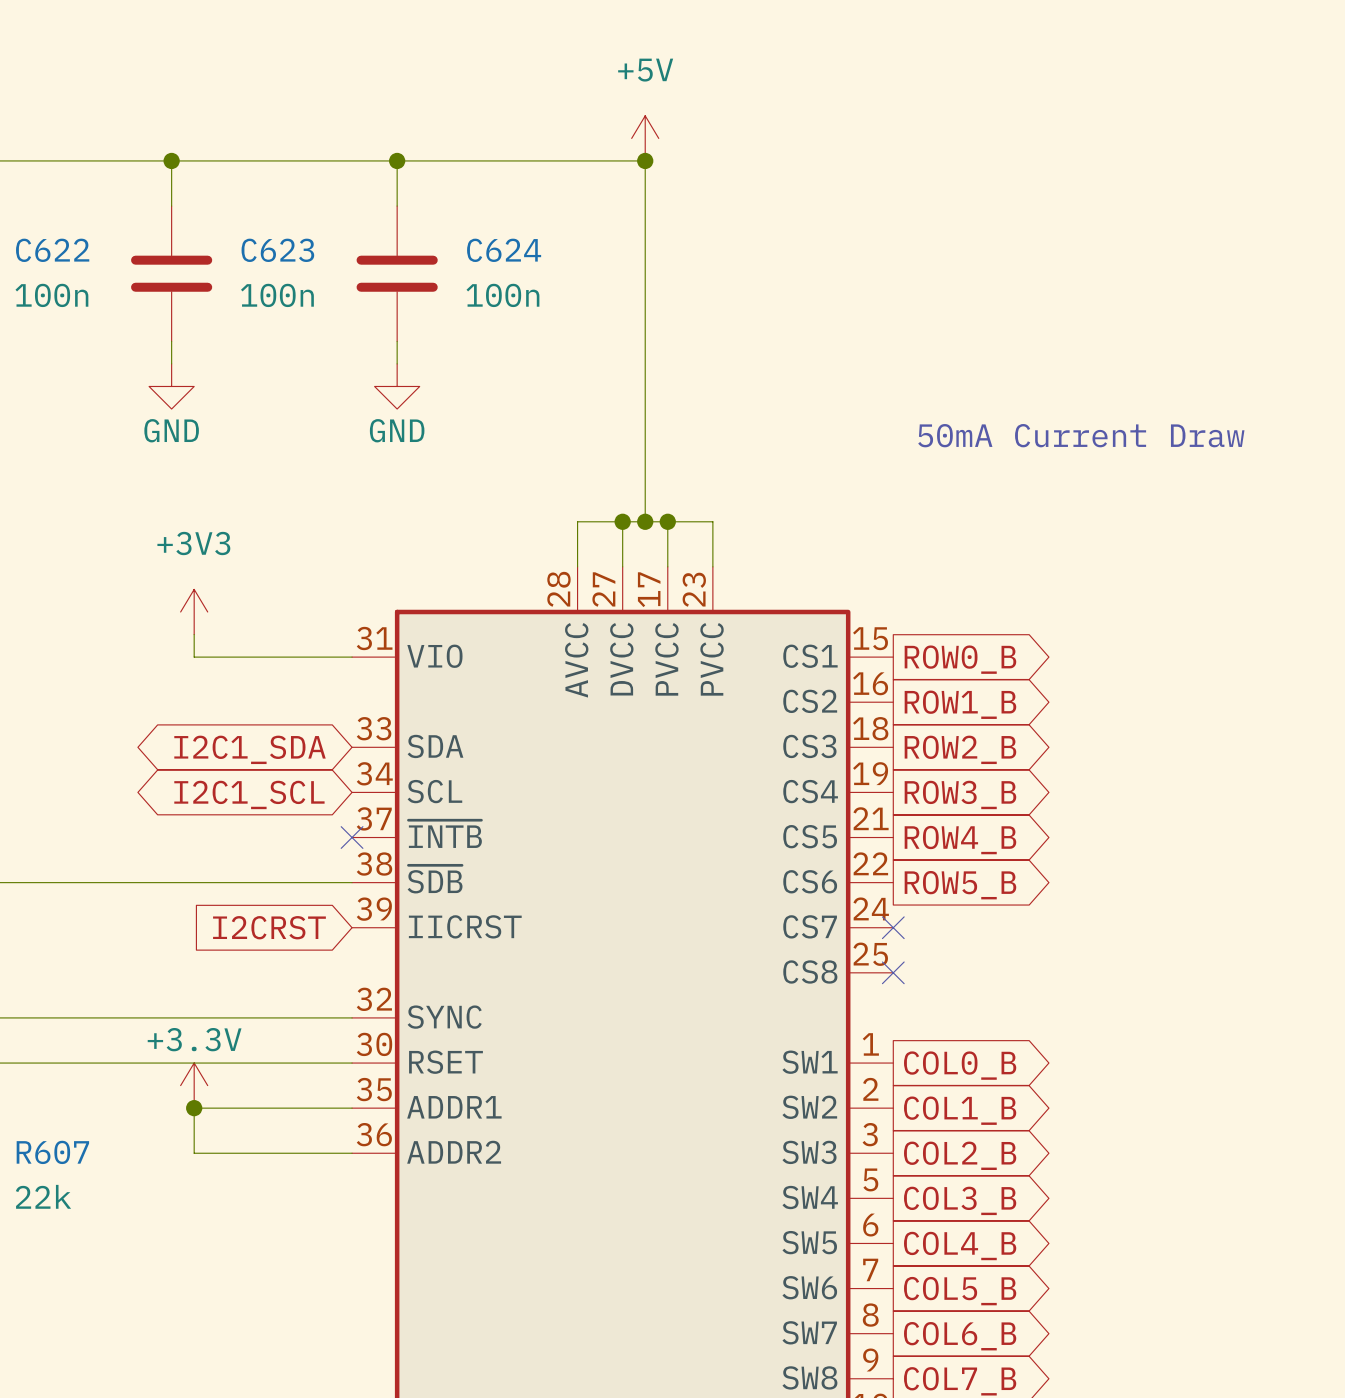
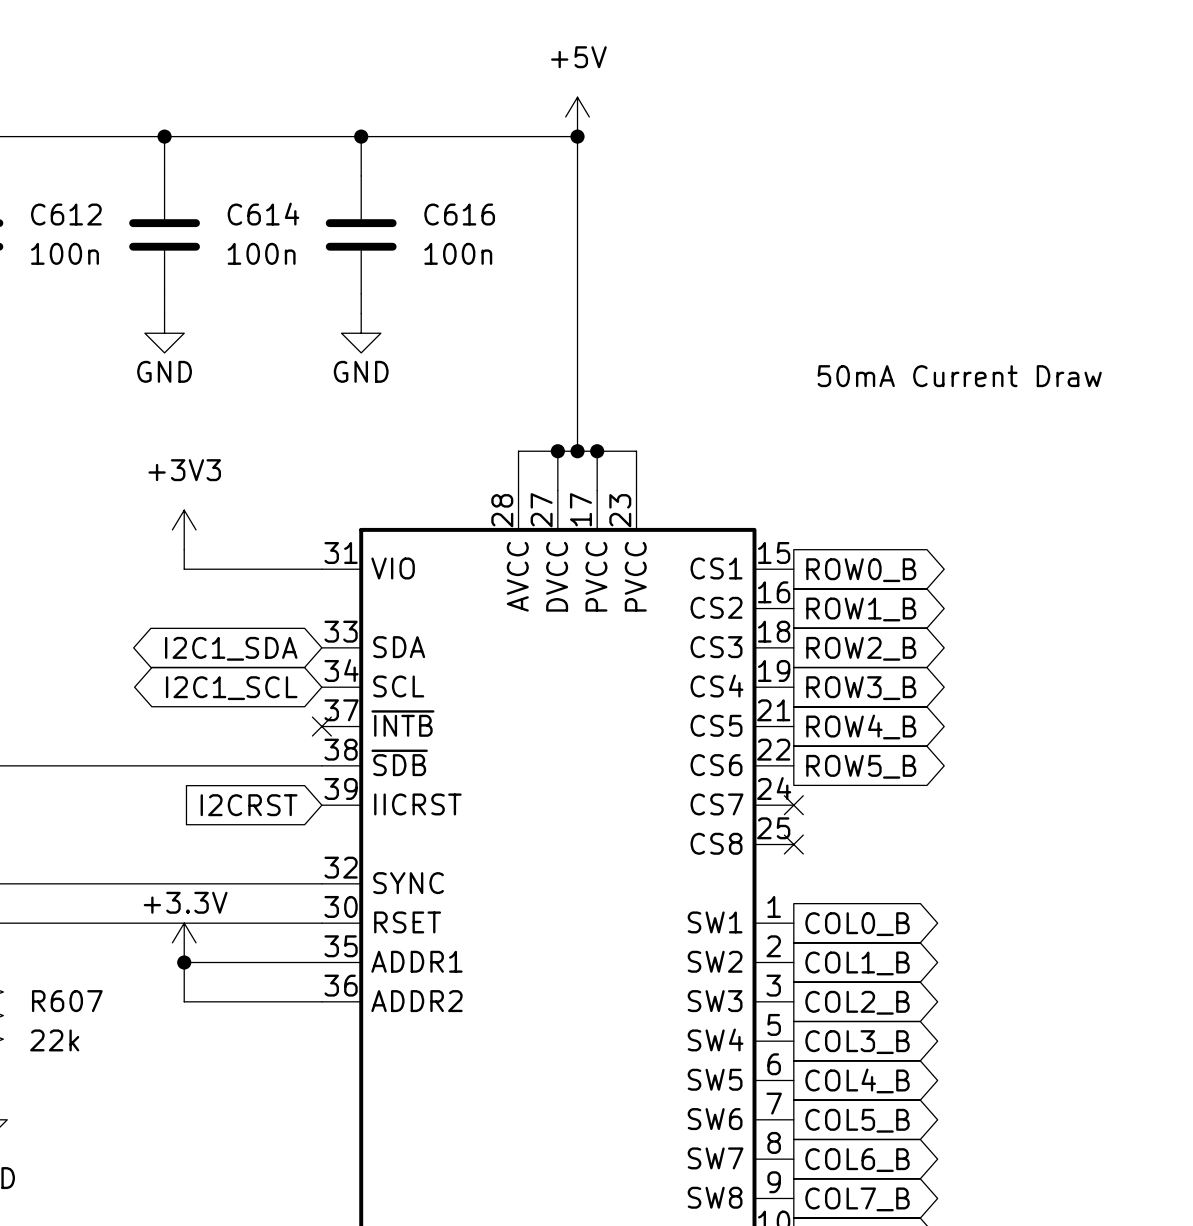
C622 name: C622 (52, 250) -> C612 (66, 214)
C623 name: C623 (277, 250) -> C614 (263, 214)
C624 name: C624 (504, 250) -> C616 (459, 214)

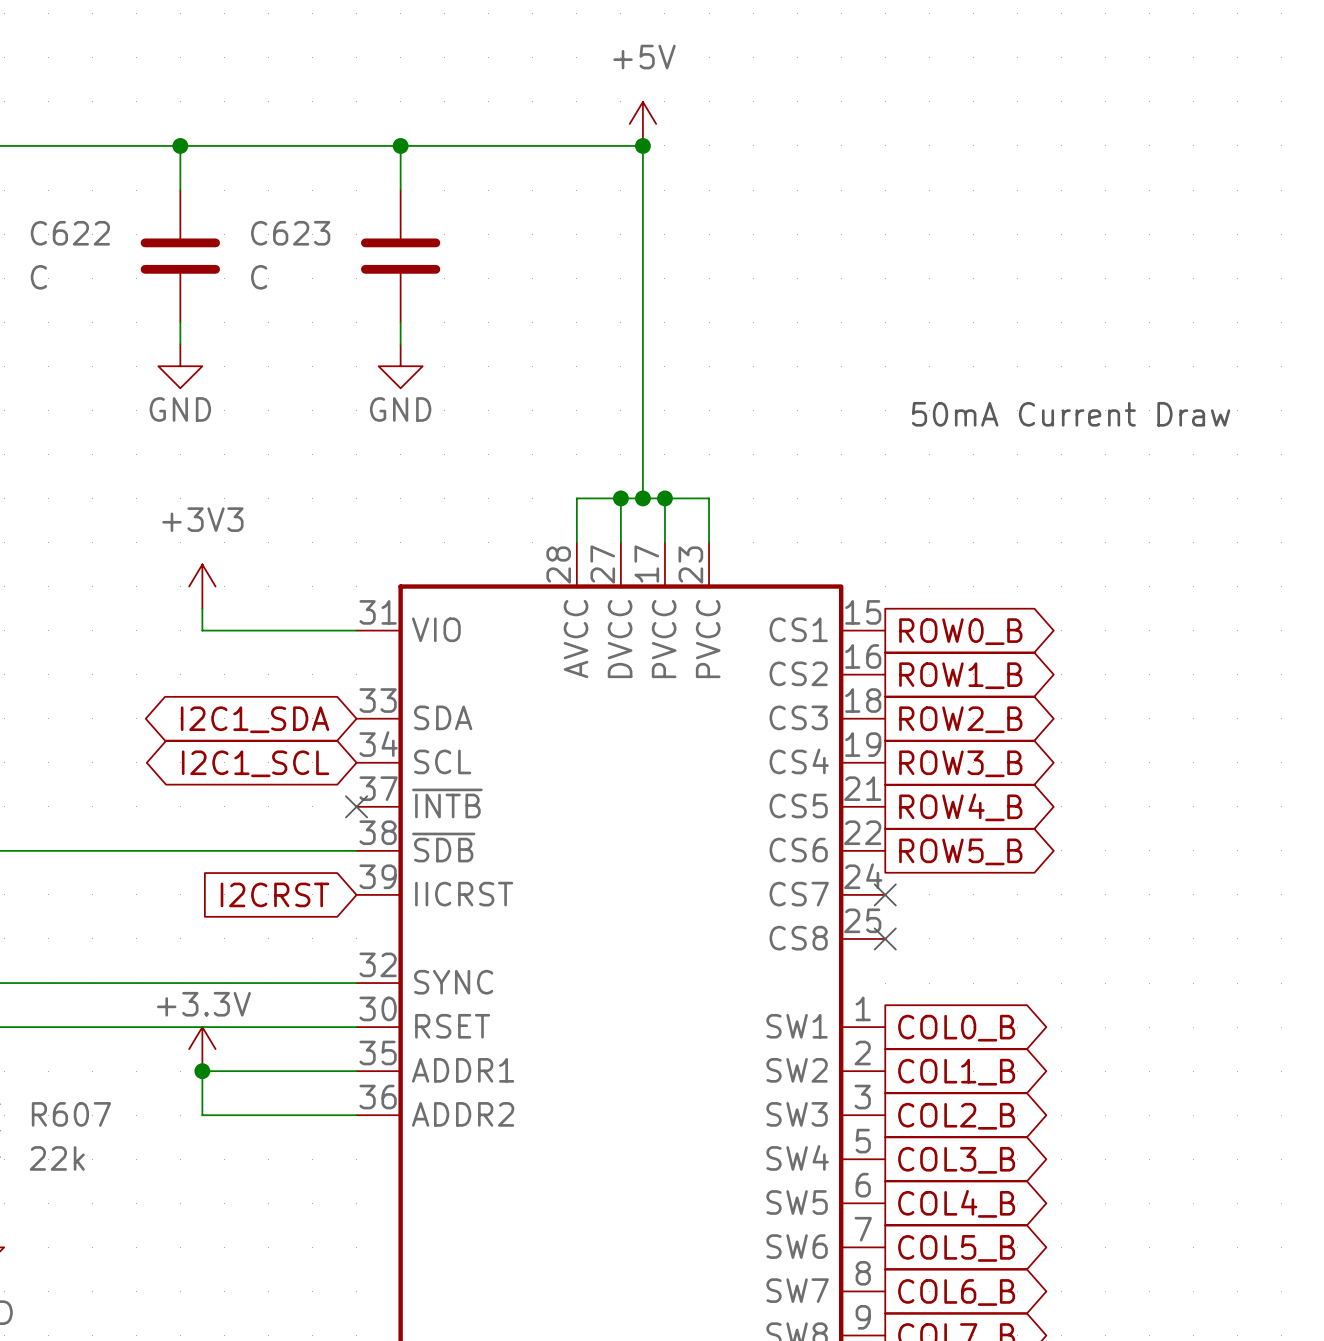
C612 name: C612 (66, 214) -> C622 (70, 233)
C614 name: C614 (263, 214) -> C623 (290, 233)
C616 name: C616 (459, 214) -> none
C612 value: 100n (64, 253) -> C (38, 277)
C614 value: 100n (261, 253) -> C (259, 277)
C616 value: 100n (458, 253) -> none

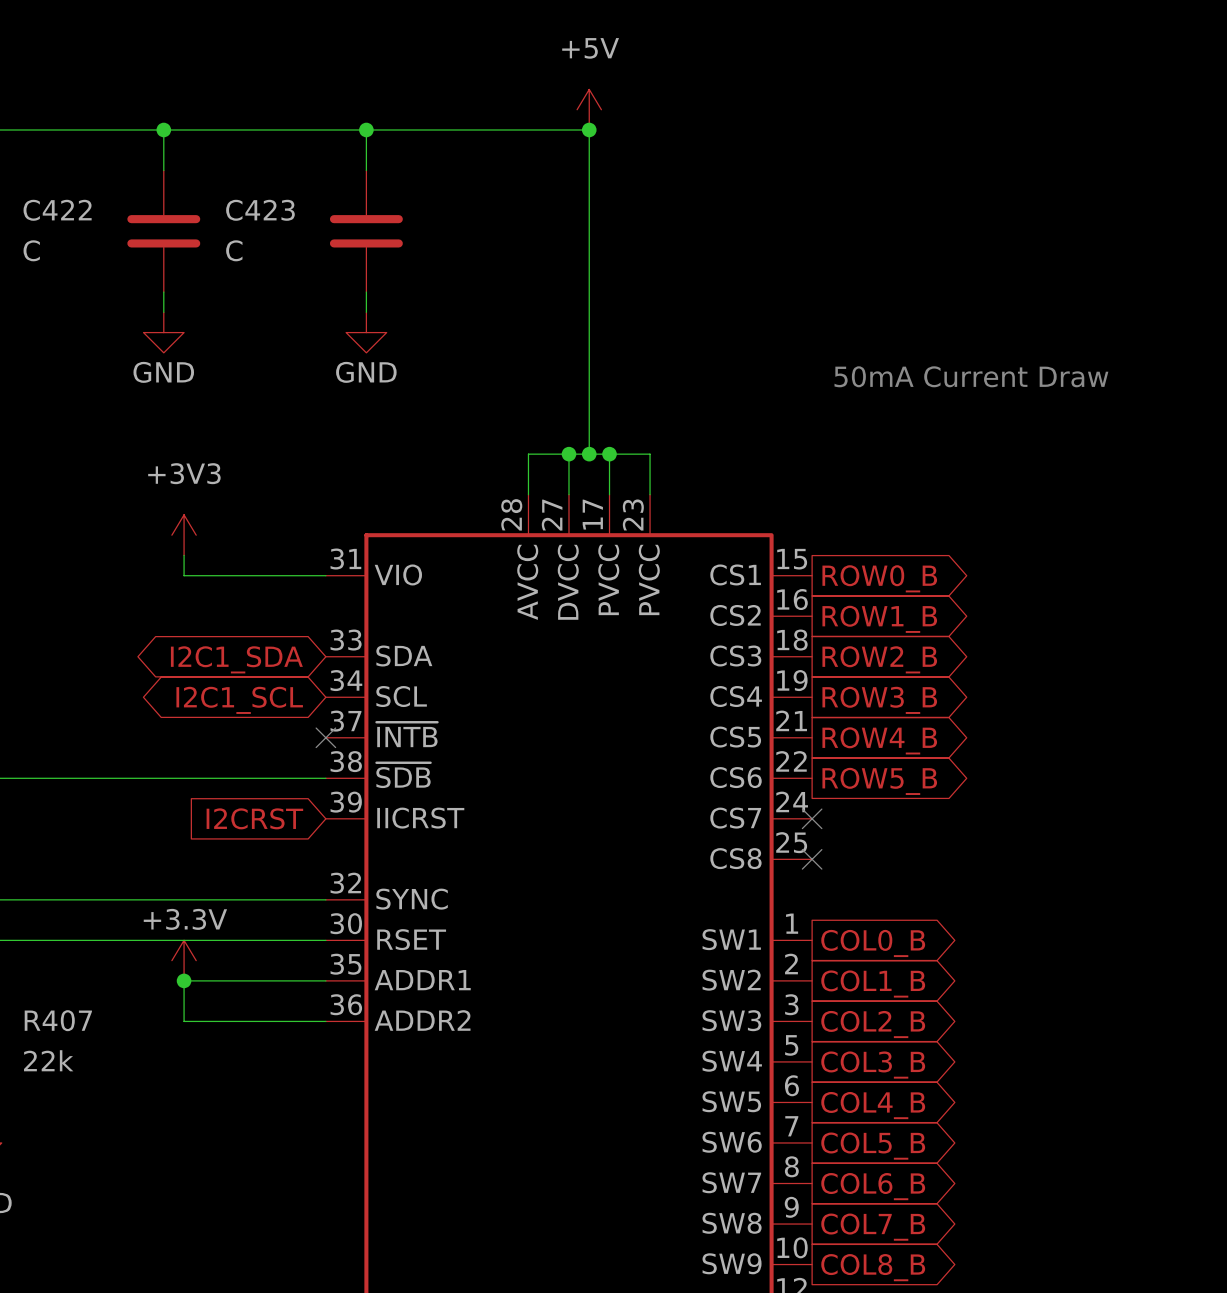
C622 name: C622 (70, 233) -> C422 (57, 210)
C623 name: C623 (290, 233) -> C423 (260, 210)
R607 name: R607 (71, 1114) -> R407 (58, 1020)

